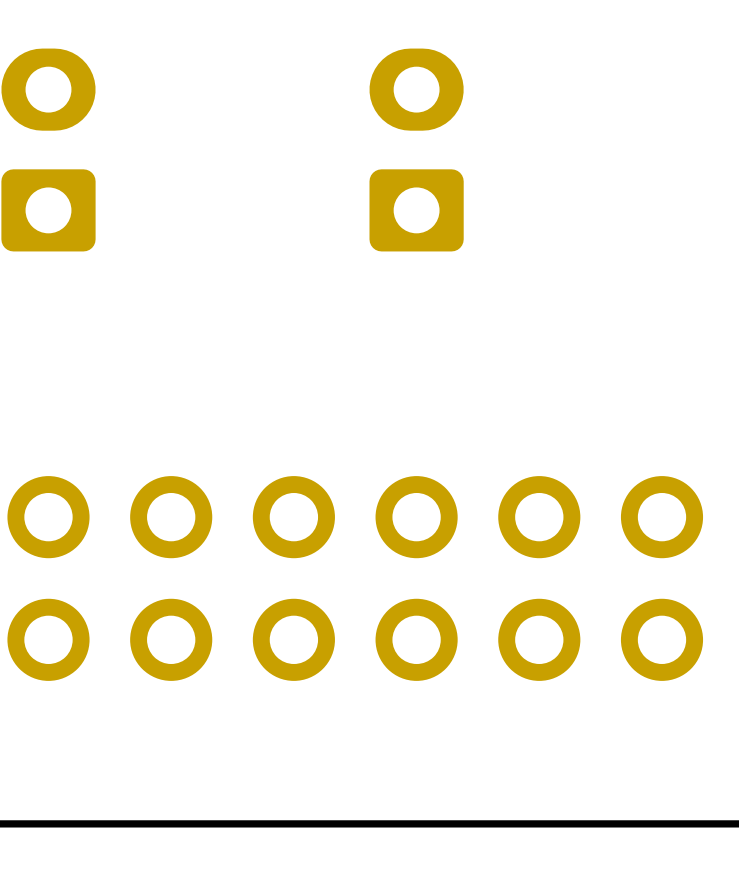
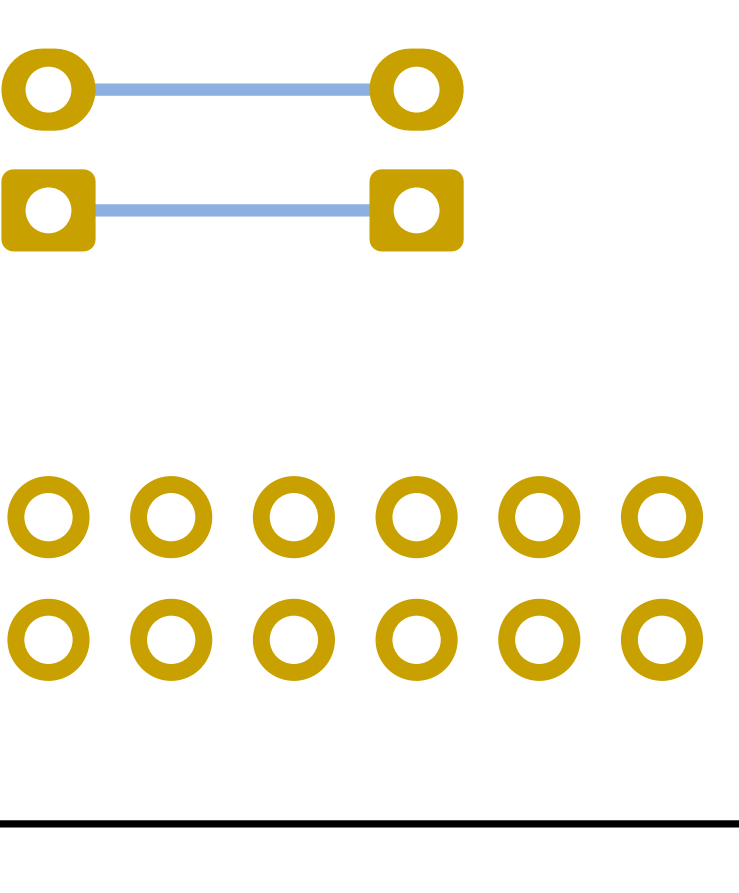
track: none -> (416, 89) (48, 89)
track: none -> (416, 210) (48, 210)

